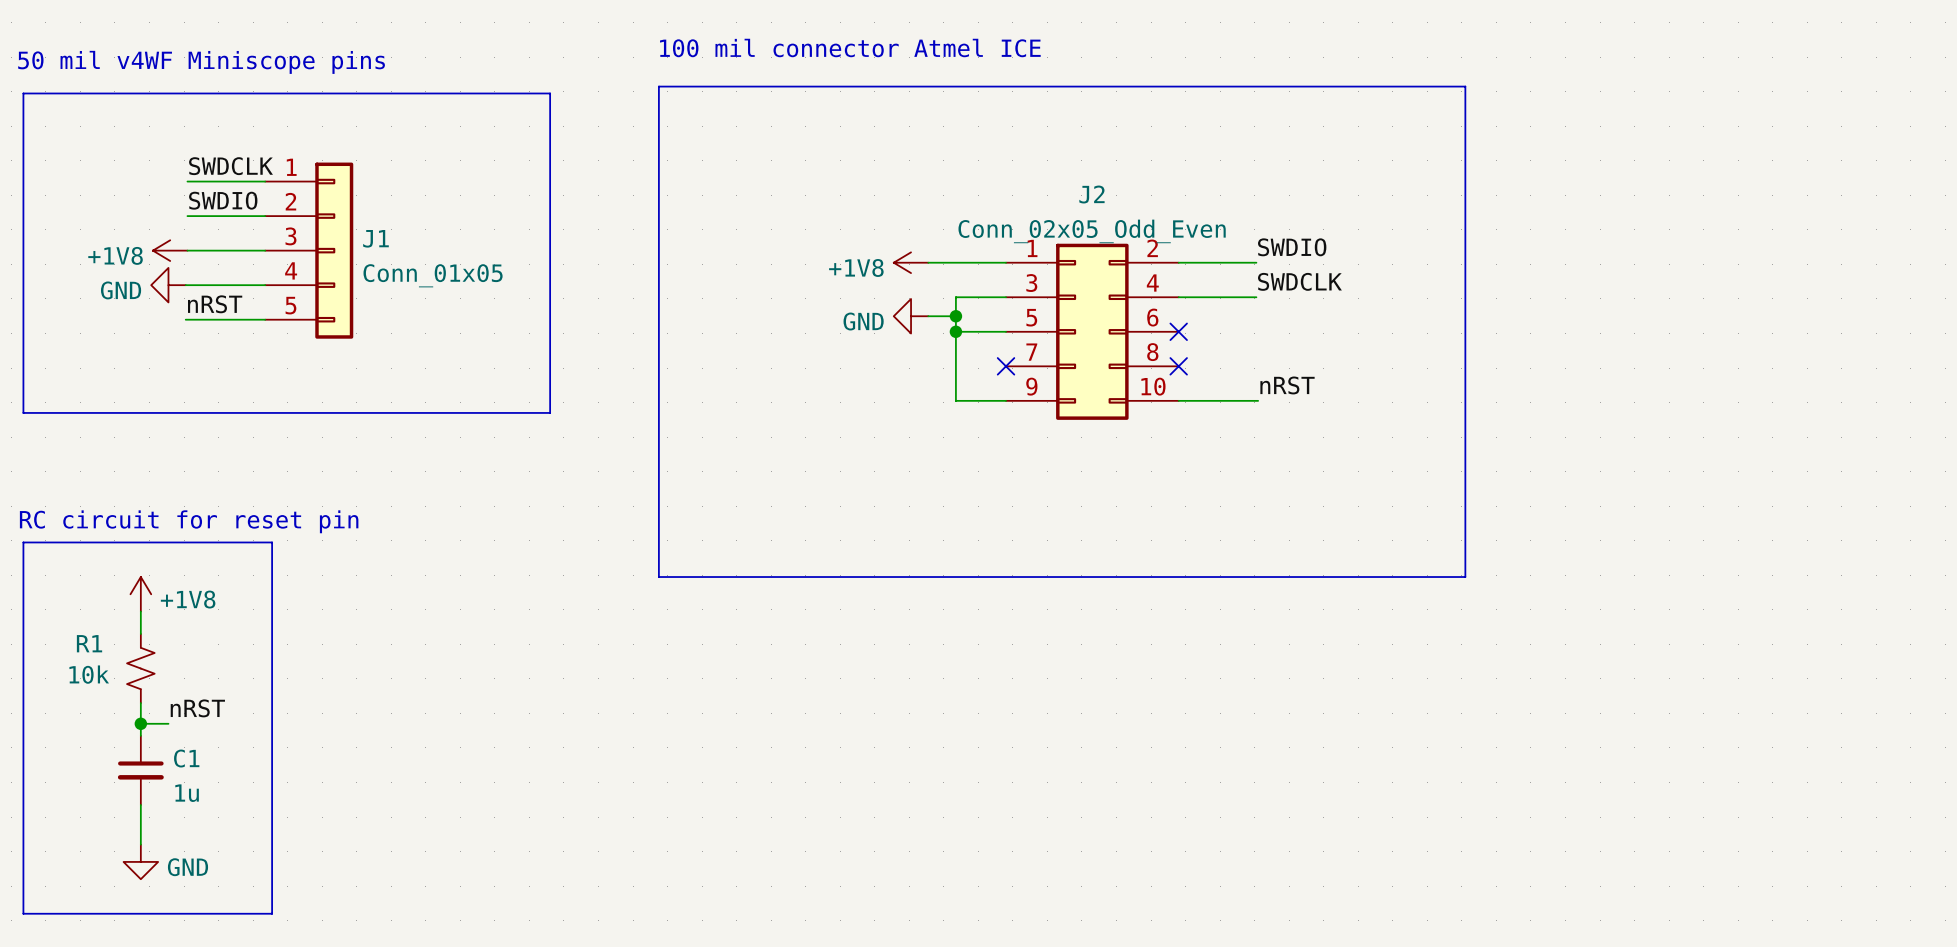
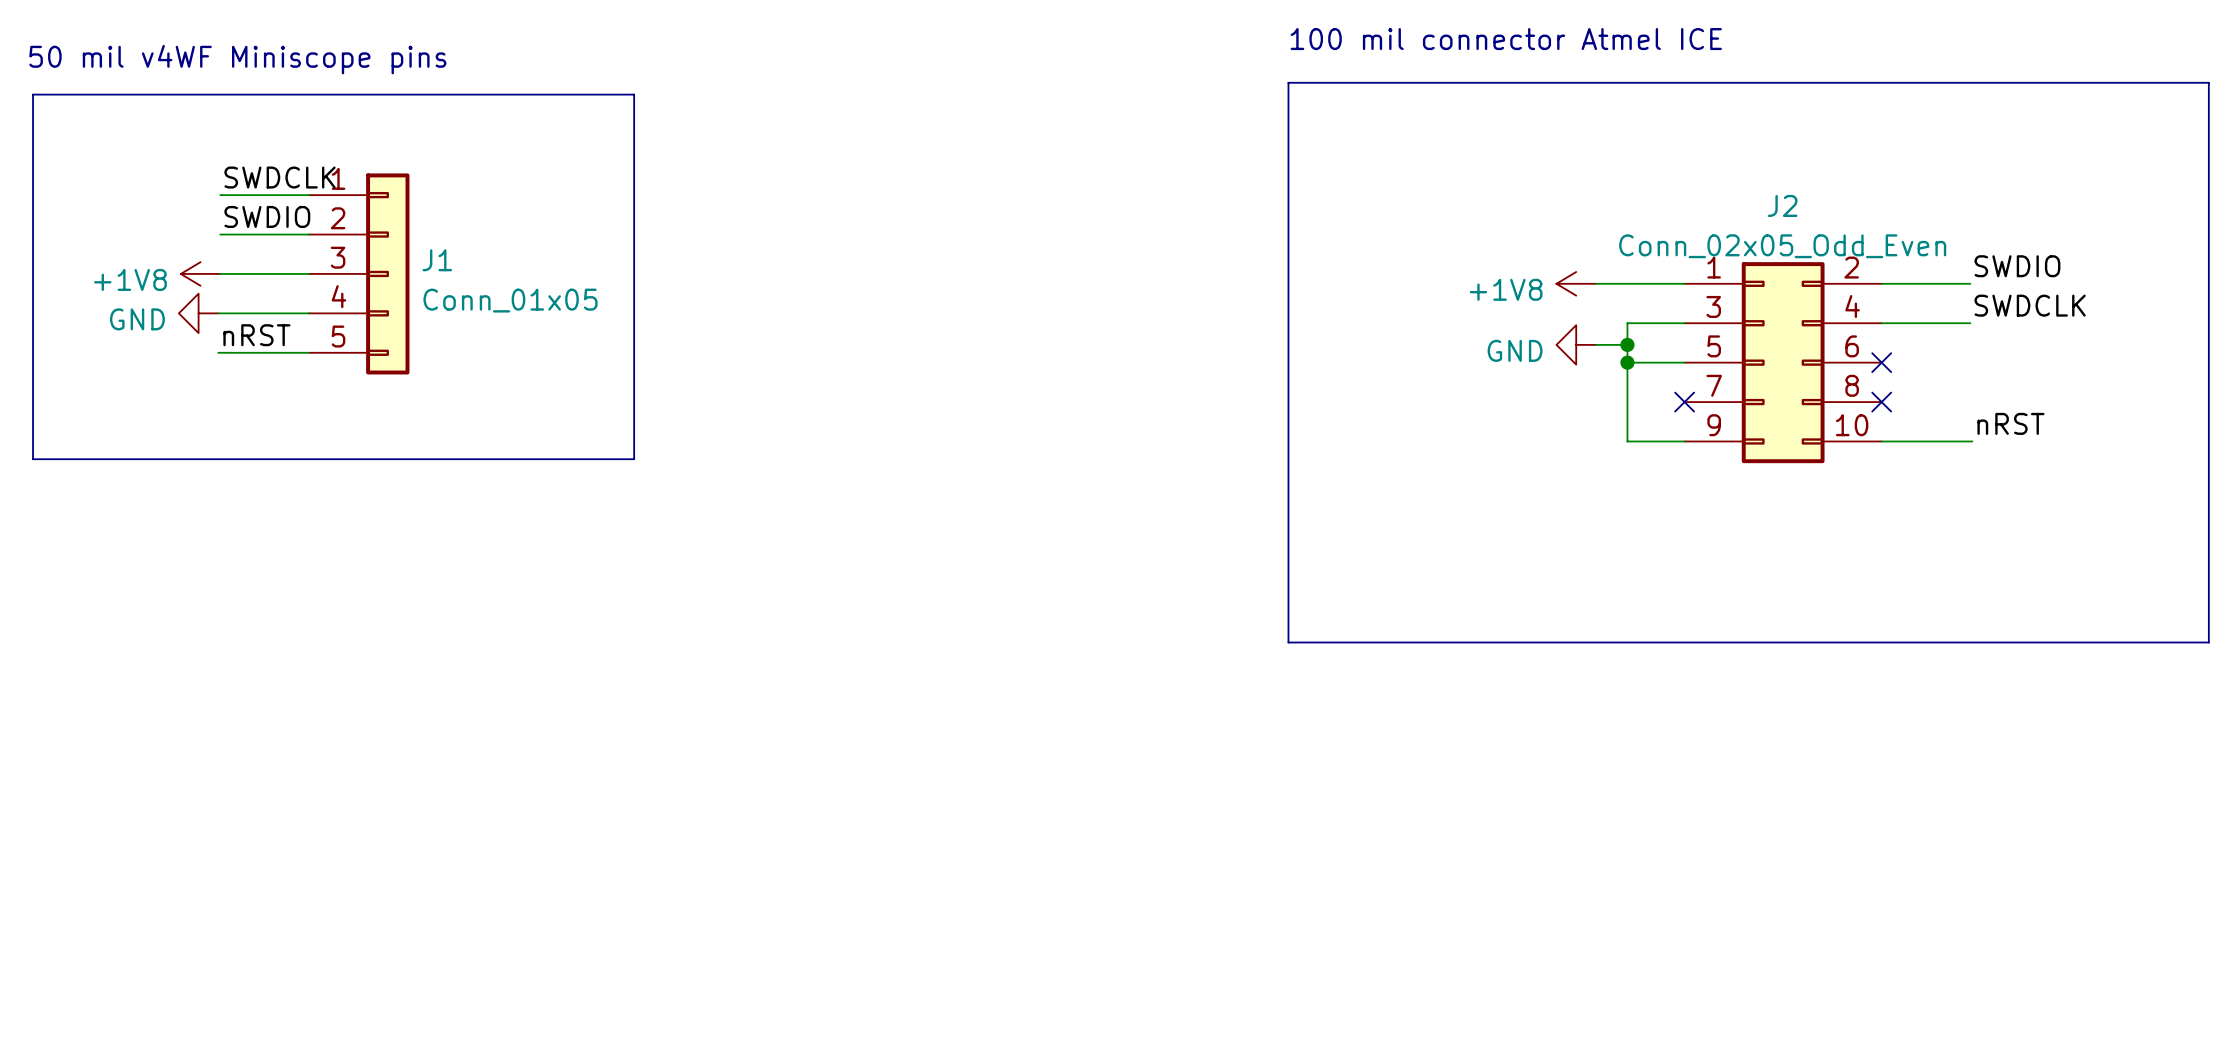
text: none -> 100 mil connector Atmel ICE (1506, 39)
text: 100 mil connector Atmel ICE (850, 47) -> none
line: none -> (1288, 82) (2208, 82) (2208, 642) (1288, 642) (1288, 82)
line: (658, 86) (1465, 86) (1465, 577) (658, 577) (658, 86) -> none
label: none -> SWDIO (2017, 266)
label: SWDIO (1292, 247) -> none
power symbol: none -> +1V8 (1576, 283)
wire: none -> (1881, 283) (1970, 283)
power symbol: +1V8 (911, 262) -> none
wire: (928, 262) (1006, 262) -> none
wire: (1178, 262) (1256, 262) -> (1595, 283) (1684, 283)
label: none -> SWDCLK (2030, 305)
label: SWDCLK (1299, 281) -> none
wire: none -> (1684, 323) (1627, 323) (1627, 441) (1684, 441)
wire: none -> (1881, 323) (1970, 323)
wire: (1006, 297) (955, 297) (955, 400) (1006, 400) -> none
wire: (1178, 297) (1256, 297) -> none
power symbol: none -> GND (1576, 344)
wire: none -> (1595, 344) (1627, 344)
junction: none -> (1627, 344)
power symbol: GND (911, 316) -> none
wire: (928, 316) (955, 316) -> none
junction: (955, 316) -> none
wire: none -> (1627, 362) (1684, 362)
junction: none -> (1627, 362)
no-connect mark: none -> (1881, 362)
wire: (955, 331) (1006, 331) -> none
junction: (955, 331) -> none
J2 position: (1092, 331) -> (1783, 362)
no-connect mark: (1178, 331) -> none
no-connect mark: none -> (1684, 402)
no-connect mark: none -> (1881, 402)
no-connect mark: (1006, 366) -> none
no-connect mark: (1178, 366) -> none
label: none -> nRST (2010, 423)
label: nRST (1287, 385) -> none
wire: none -> (1881, 441) (1972, 441)
wire: (1178, 400) (1258, 400) -> none
text: RC circuit for reset pin (189, 521) -> none
line: (23, 542) (272, 542) (272, 913) (23, 913) (23, 542) -> none
power symbol: +1V8 (140, 594) -> none
wire: (140, 611) (140, 633) -> none
R1: 10k (140, 668) -> none
wire: (140, 703) (140, 735) -> none
label: nRST (197, 708) -> none
wire: (140, 723) (168, 723) -> none
junction: (140, 723) -> none
C1: 1u (140, 770) -> none
wire: (140, 804) (140, 844) -> none
power symbol: GND (140, 861) -> none

